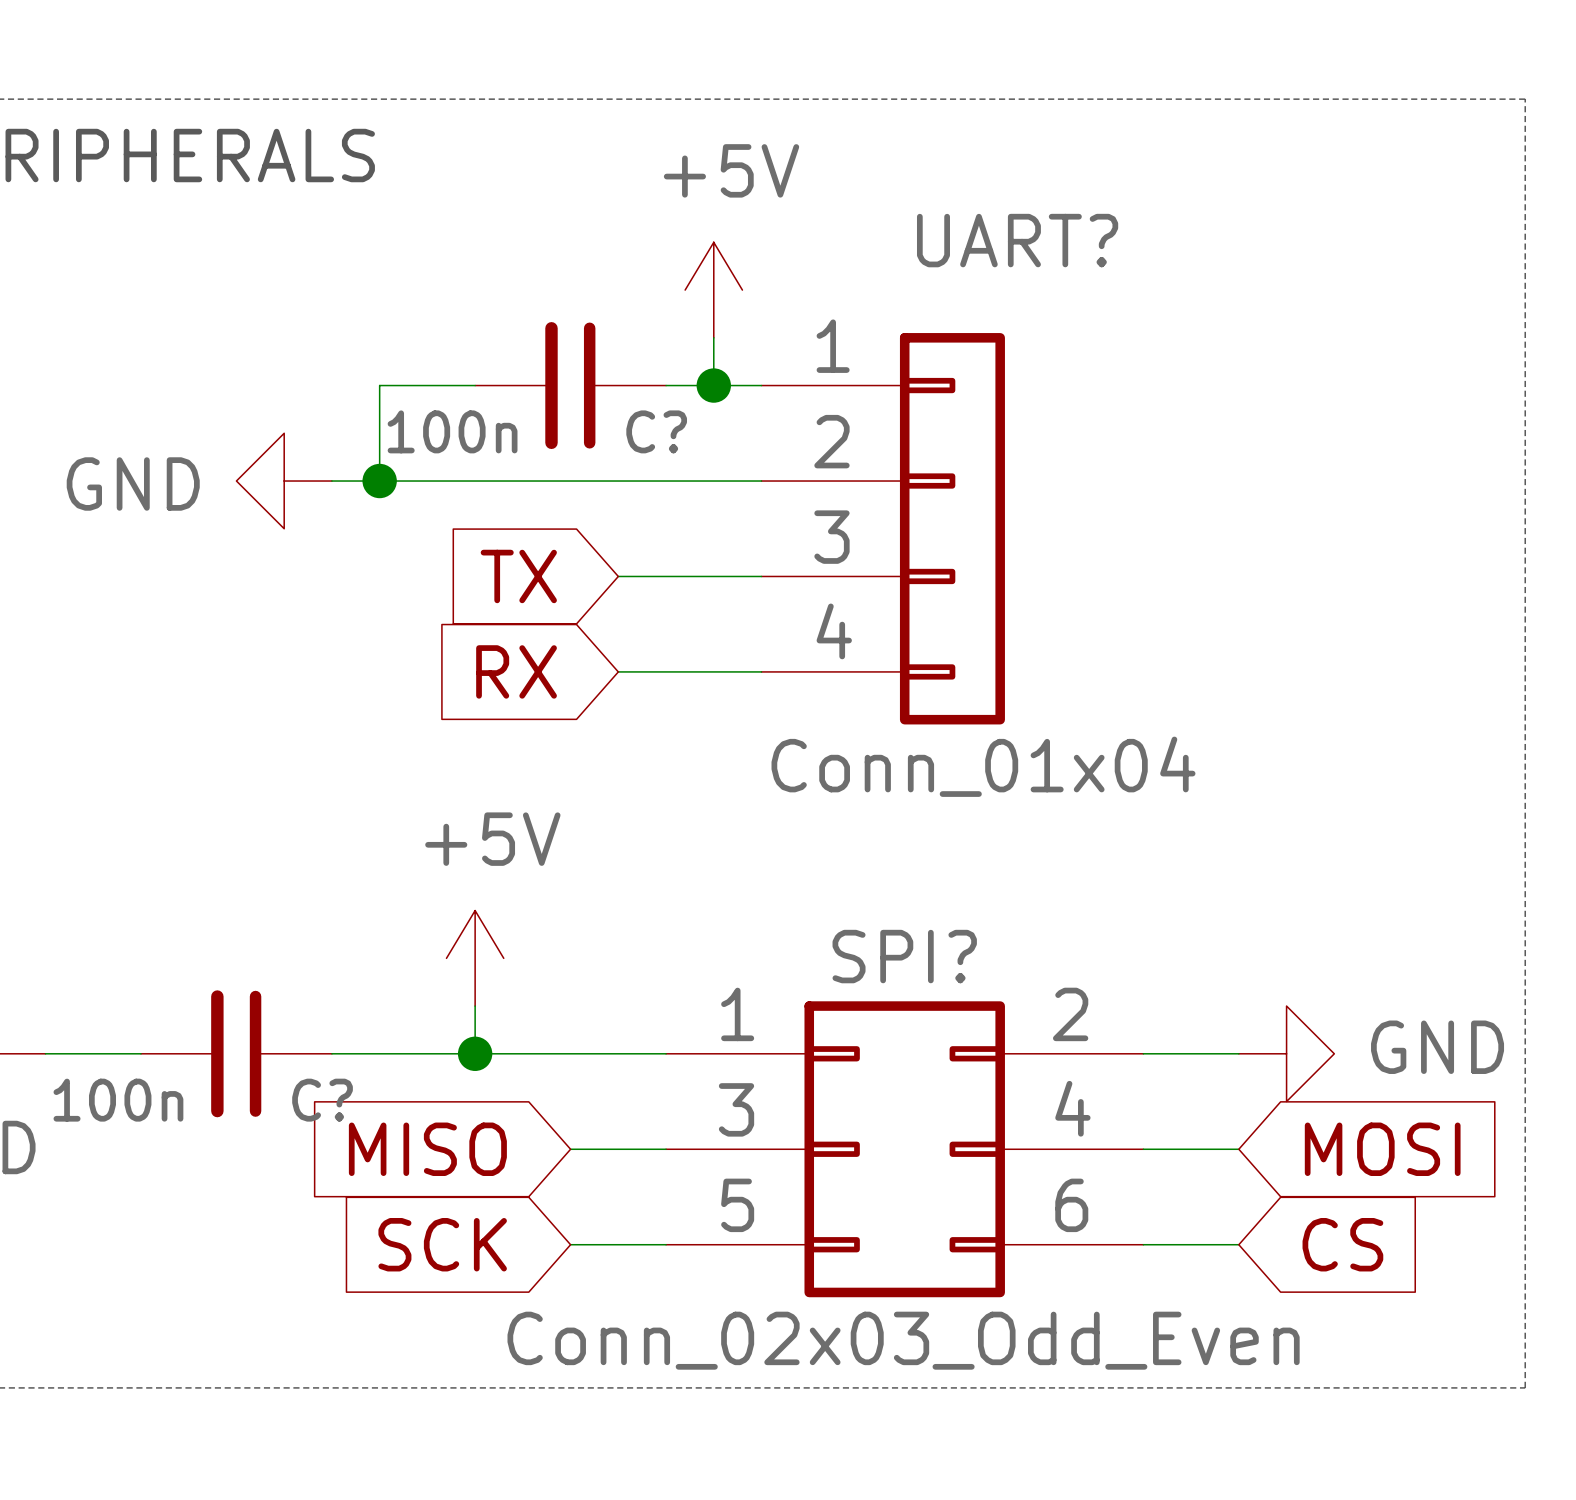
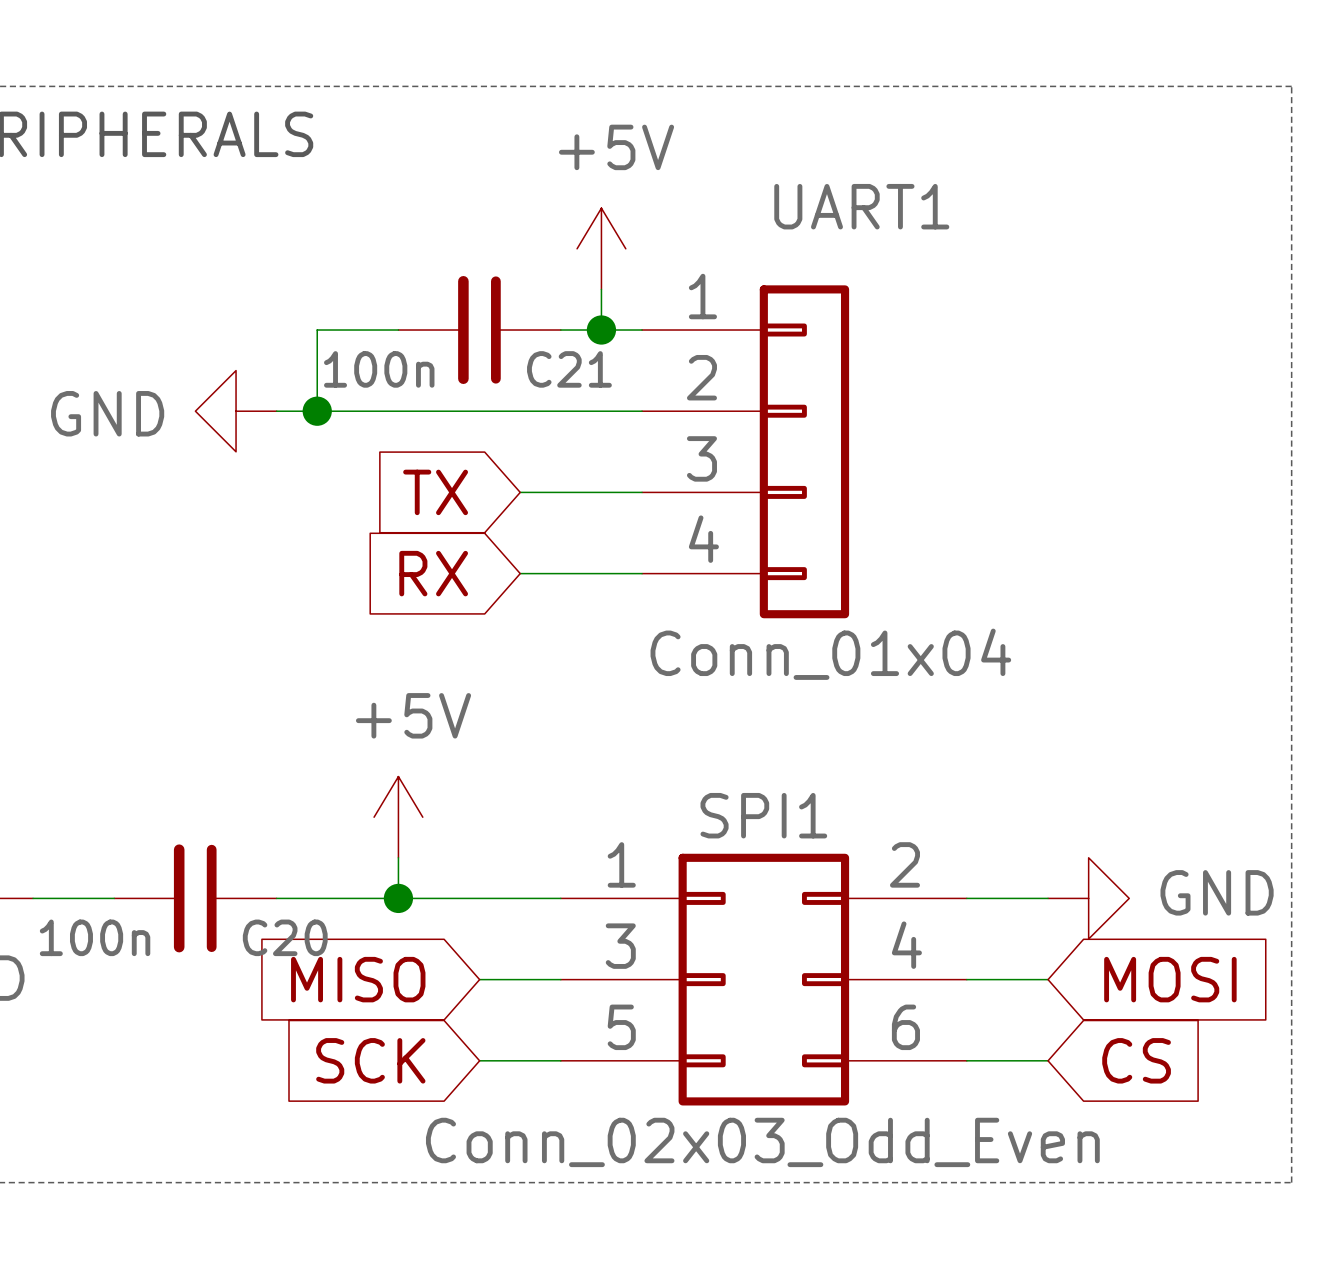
UART? name: UART? (1017, 240) -> UART1 (861, 206)
C? name: C? (656, 431) -> C21 (569, 369)
SPI? name: SPI? (904, 956) -> SPI1 (763, 815)
C? name: C? (322, 1100) -> C20 (285, 937)

